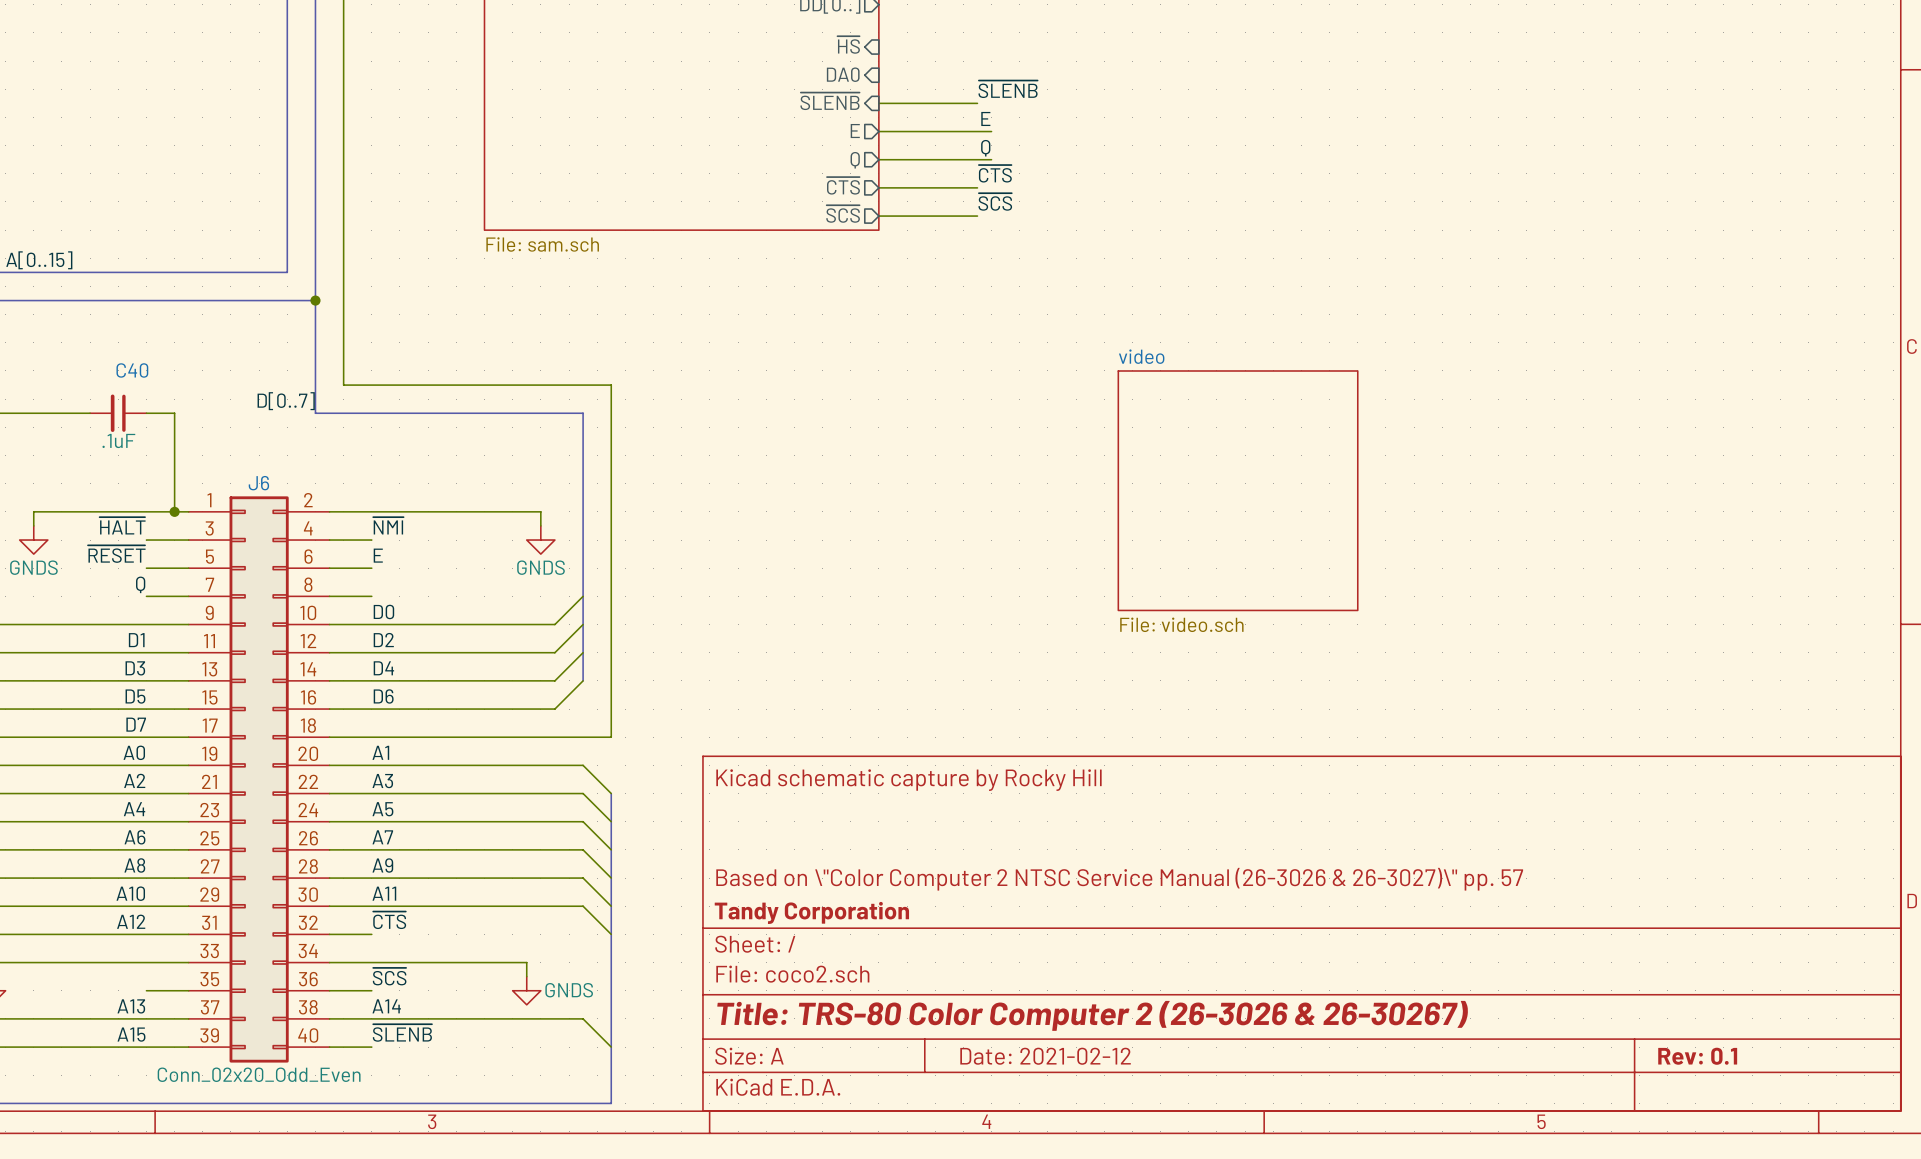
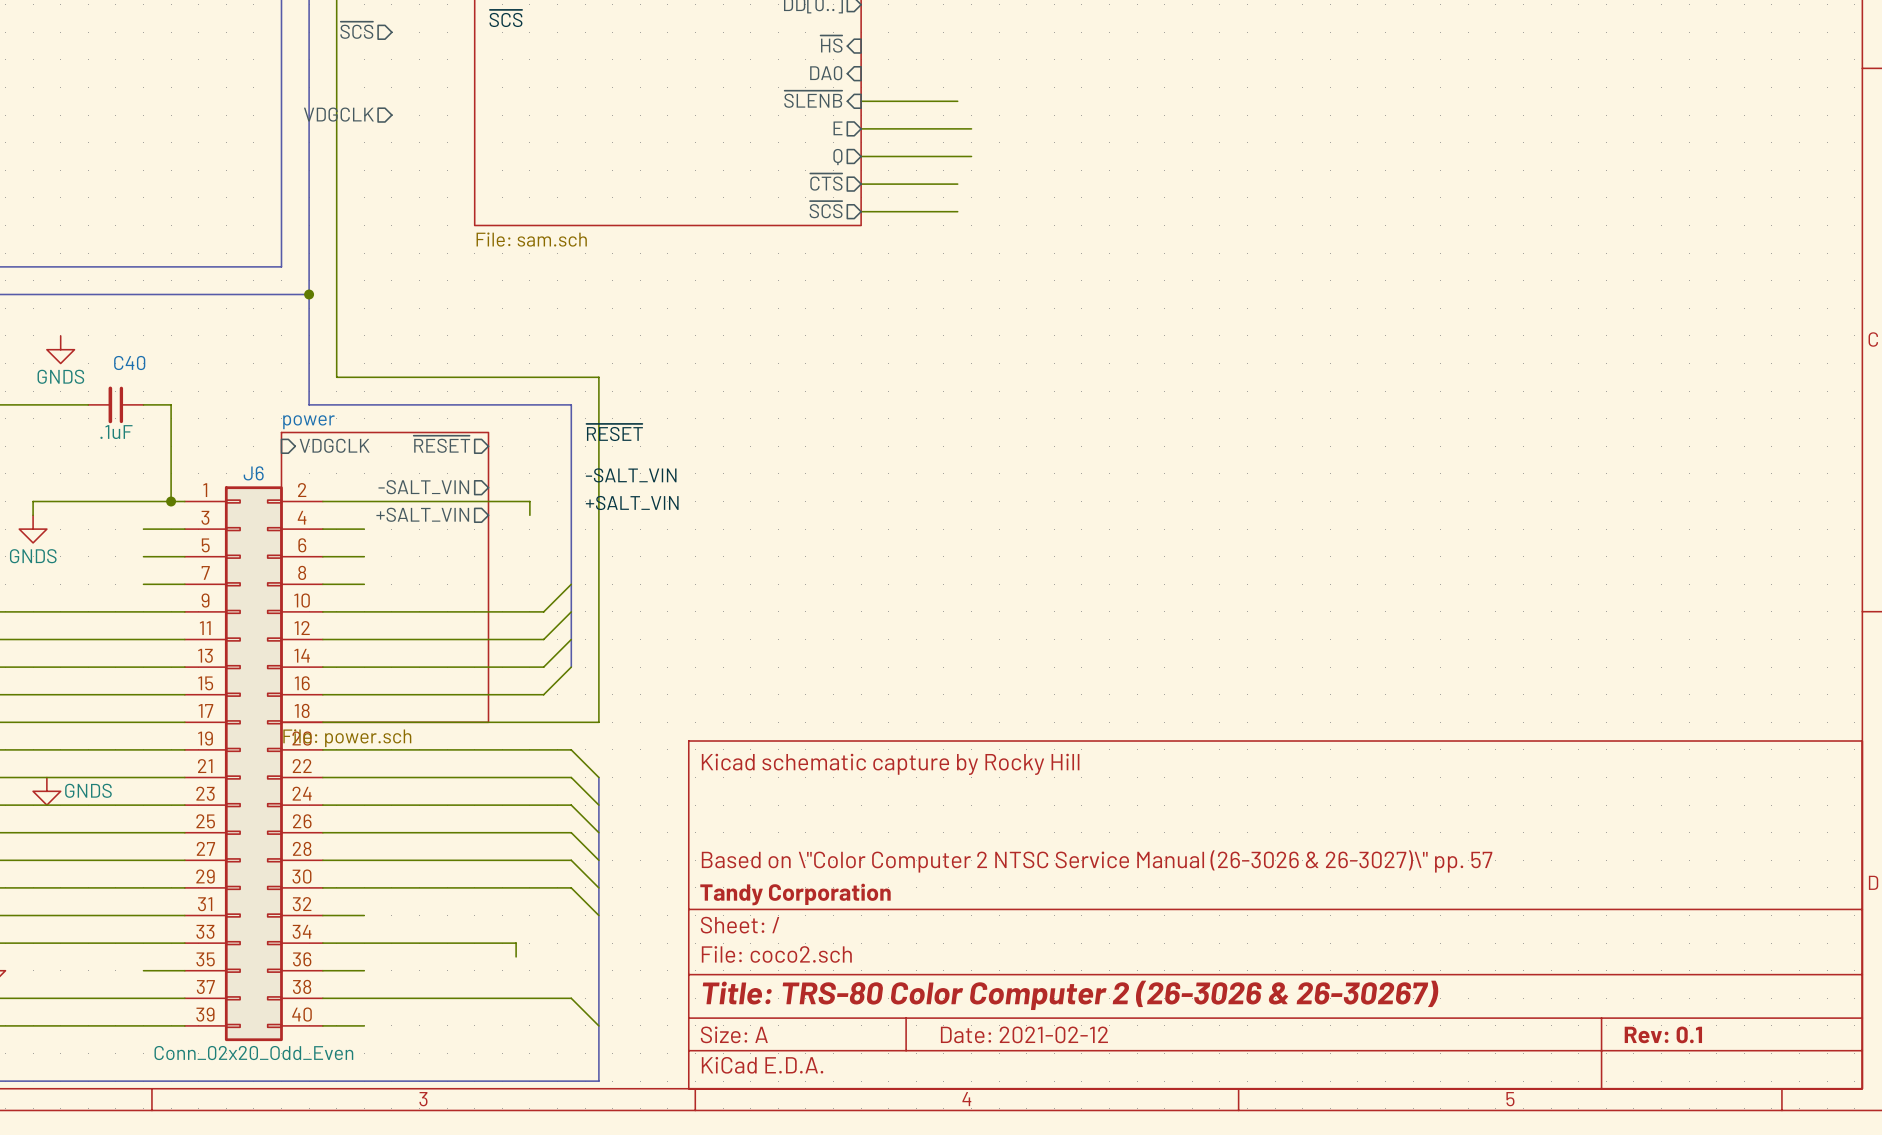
label: none -> ~{SCS} (505, 18)
sheet pin: none -> ~{SCS} (356, 30)
label: ~{SLENB} (1008, 89) -> none
sheet pin: none -> VDGCLK (338, 114)
label: E (985, 118) -> none
label: Q (985, 148) -> none
label: ~{CTS} (995, 173) -> none
label: ~{SCS} (995, 201) -> none
label: A[0..15] (39, 260) -> none
power symbol: none -> GNDS (60, 349)
label: D[0..7] (286, 401) -> none
label: none -> ~{RESET} (614, 432)
sheet pin: none -> ~{RESET} (441, 444)
sheet pin: none -> VDGCLK (334, 445)
label: none -> -SALT_VIN (631, 475)
sheet video: File: video.sch (1238, 490) -> none
sheet pin: none -> -SALT_VIN (423, 487)
label: none -> +SALT_VIN (632, 502)
label: ~{HALT} (122, 525) -> none
label: ~{NMI} (388, 525) -> none
sheet pin: none -> +SALT_VIN (422, 514)
power symbol: GNDS (540, 540) -> none
label: ~{RESET} (116, 554) -> none
label: E (378, 555) -> none
label: Q (140, 584) -> none
sheet power: none -> File: power.sch (384, 577)
label: D0 (383, 611) -> none
label: D1 (136, 640) -> none
label: D2 (383, 640) -> none
label: D3 (135, 668) -> none
label: D4 (383, 668) -> none
label: D5 (135, 696) -> none
label: D6 (383, 696) -> none
label: D7 (136, 724) -> none
label: A0 (134, 752) -> none
label: A1 (380, 752) -> none
label: A2 (134, 780) -> none
label: A3 (382, 781) -> none
power symbol: none -> GNDS (46, 791)
label: A4 (134, 809) -> none
label: A5 (382, 809) -> none
label: A6 (134, 837) -> none
label: A7 (382, 837) -> none
label: A8 (134, 865) -> none
label: A9 (382, 865) -> none
label: A10 (130, 893) -> none
label: A11 (384, 893) -> none
label: ~{CTS} (389, 920) -> none
label: A12 (131, 921) -> none
label: ~{SCS} (389, 976) -> none
power symbol: GNDS (526, 990) -> none
label: A13 (131, 1006) -> none
label: A14 (386, 1006) -> none
label: ~{SLENB} (402, 1032) -> none
label: A15 (131, 1034) -> none

